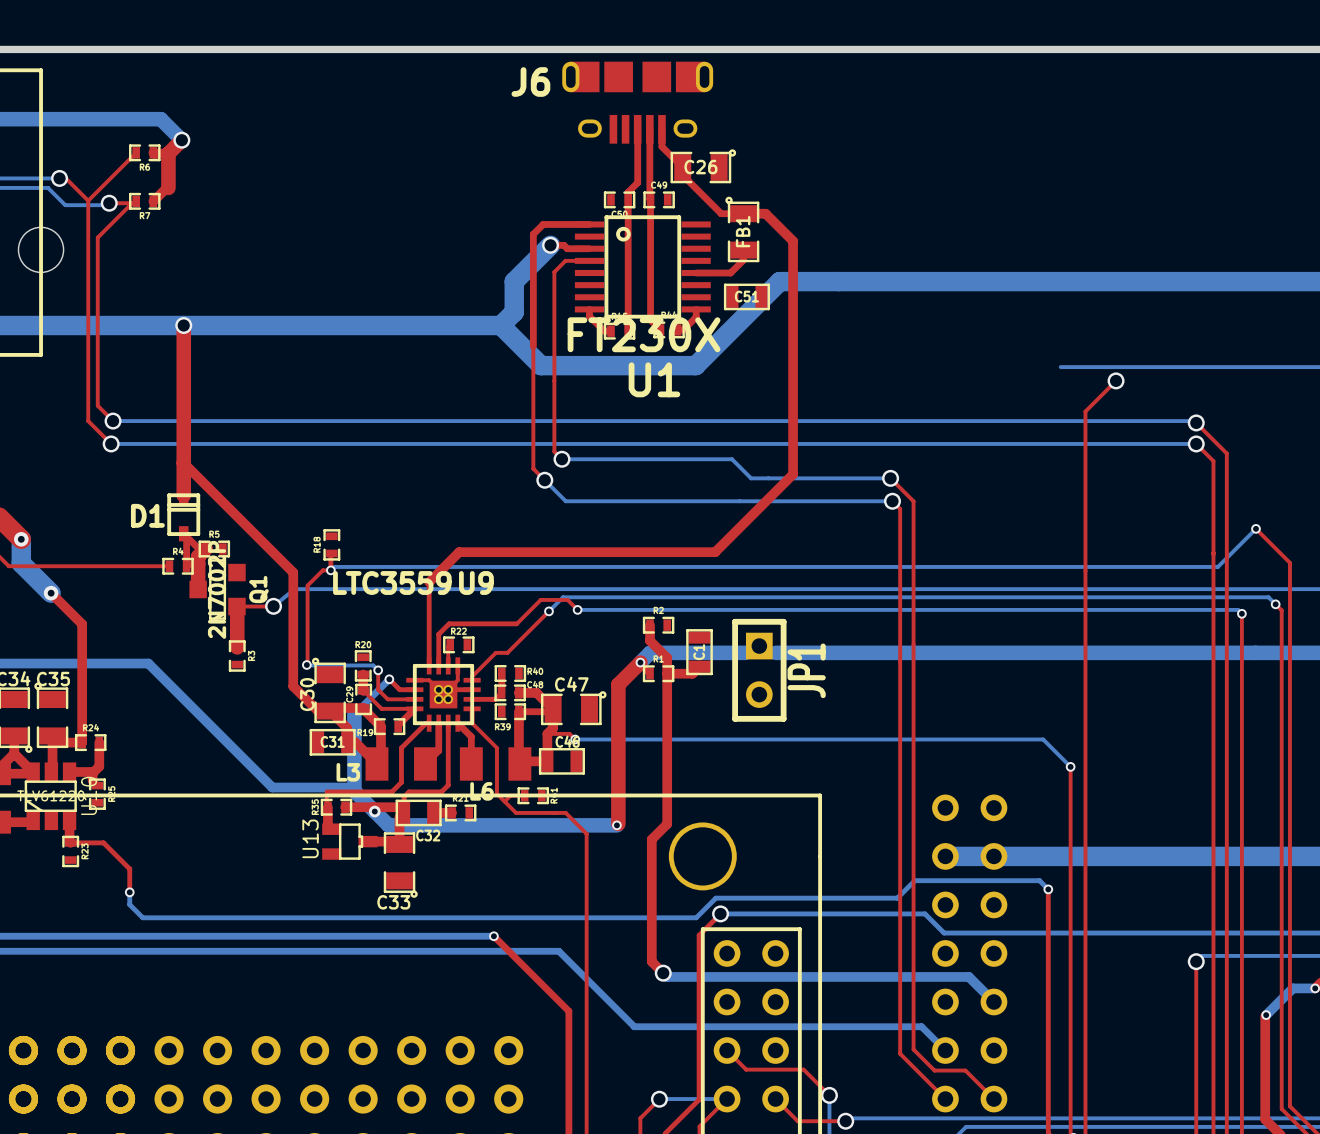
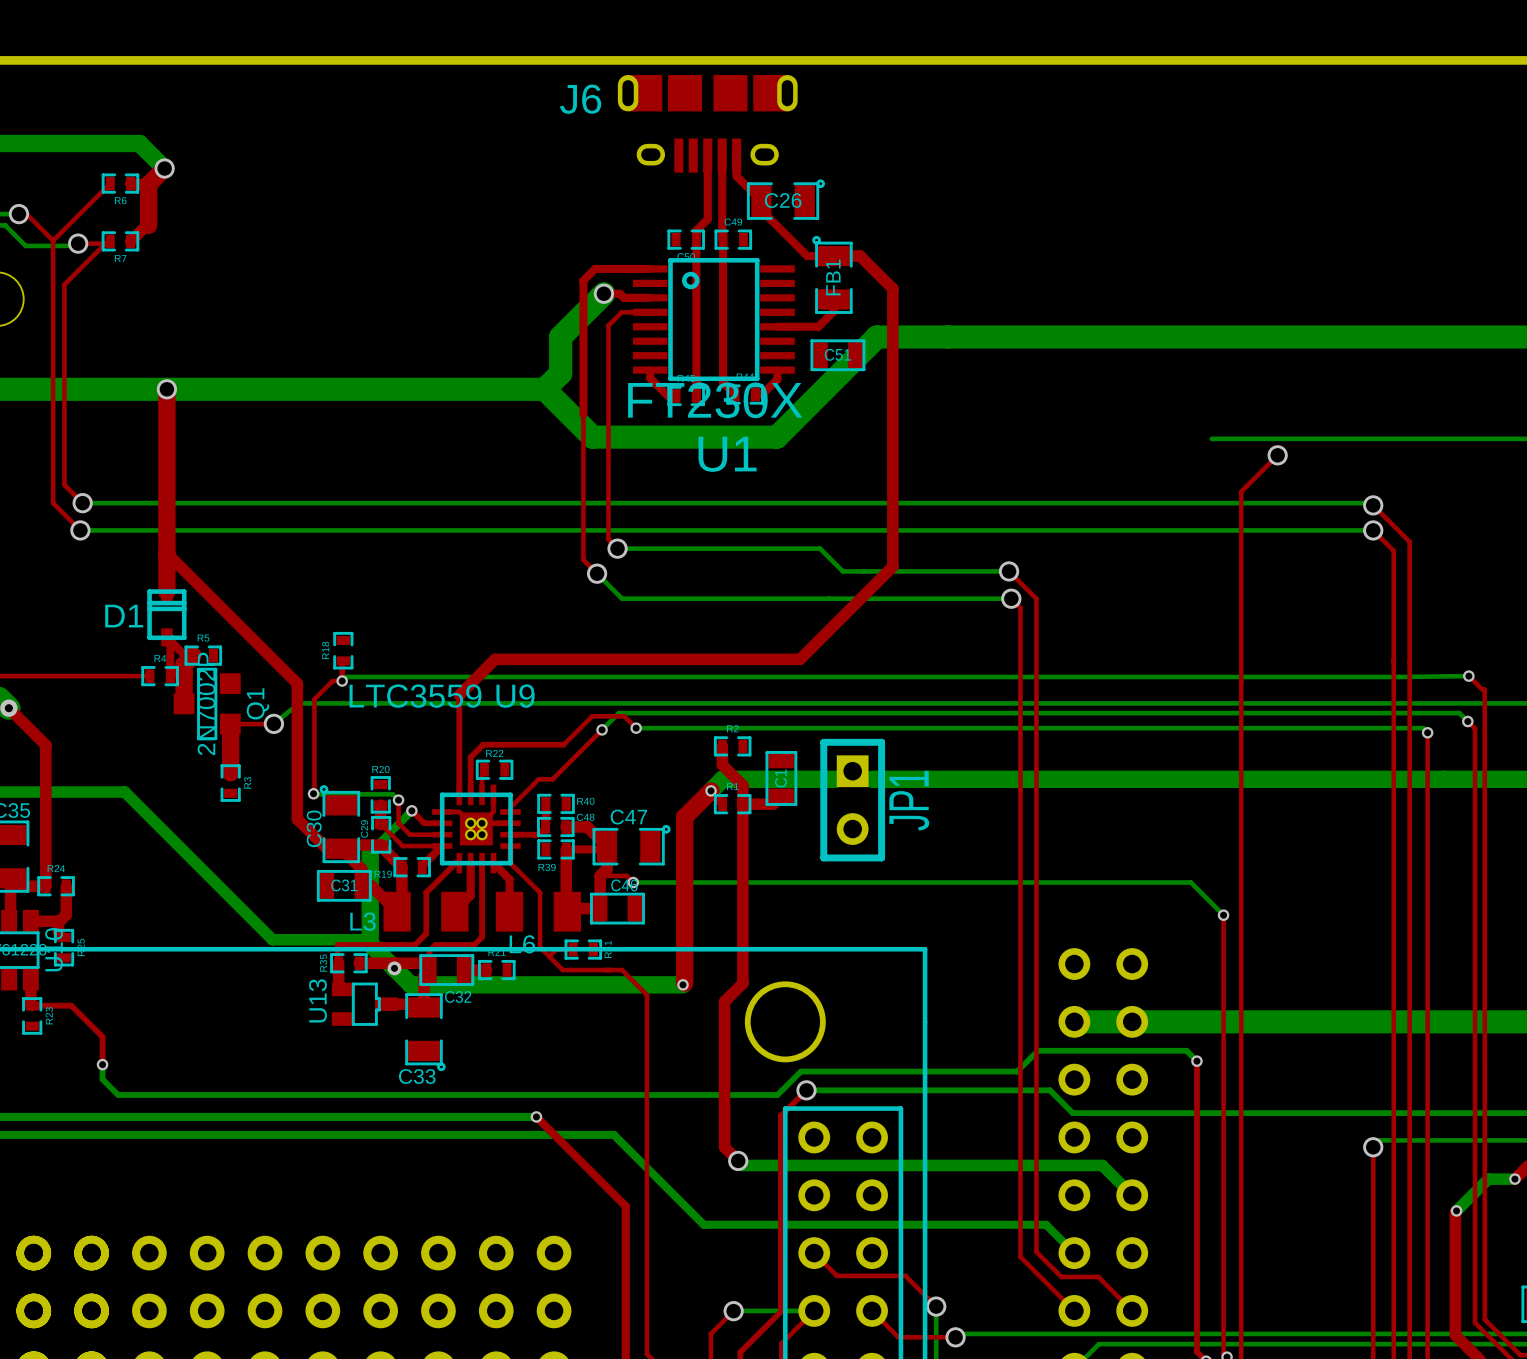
bottom track: (1255, 528) (1217, 566) -> (1468, 676) (1399, 676)
top track: (1255, 528) (1289, 562) (1289, 1106) -> (1468, 676) (1484, 689) (1484, 1319)
via position: (1255, 528) -> (1468, 676)

